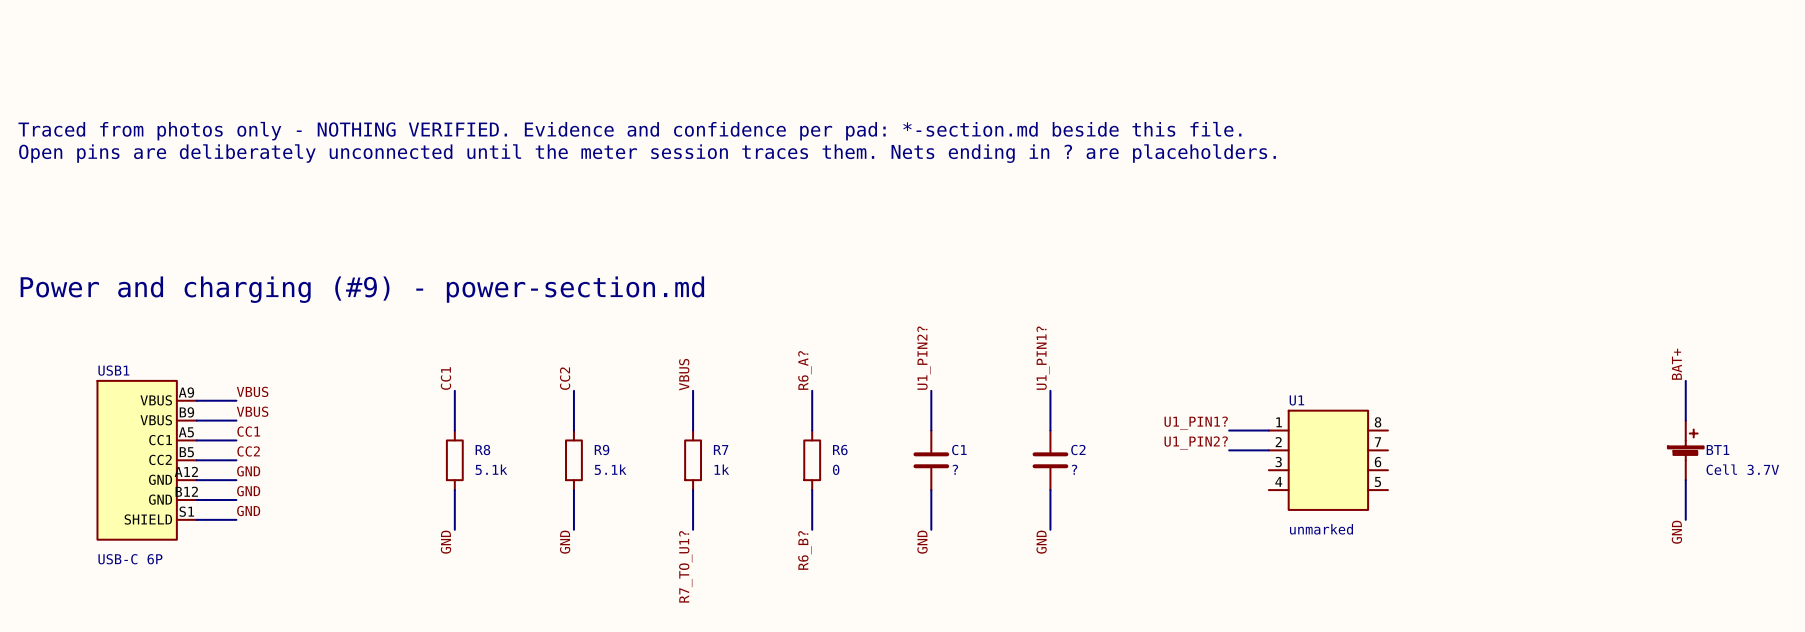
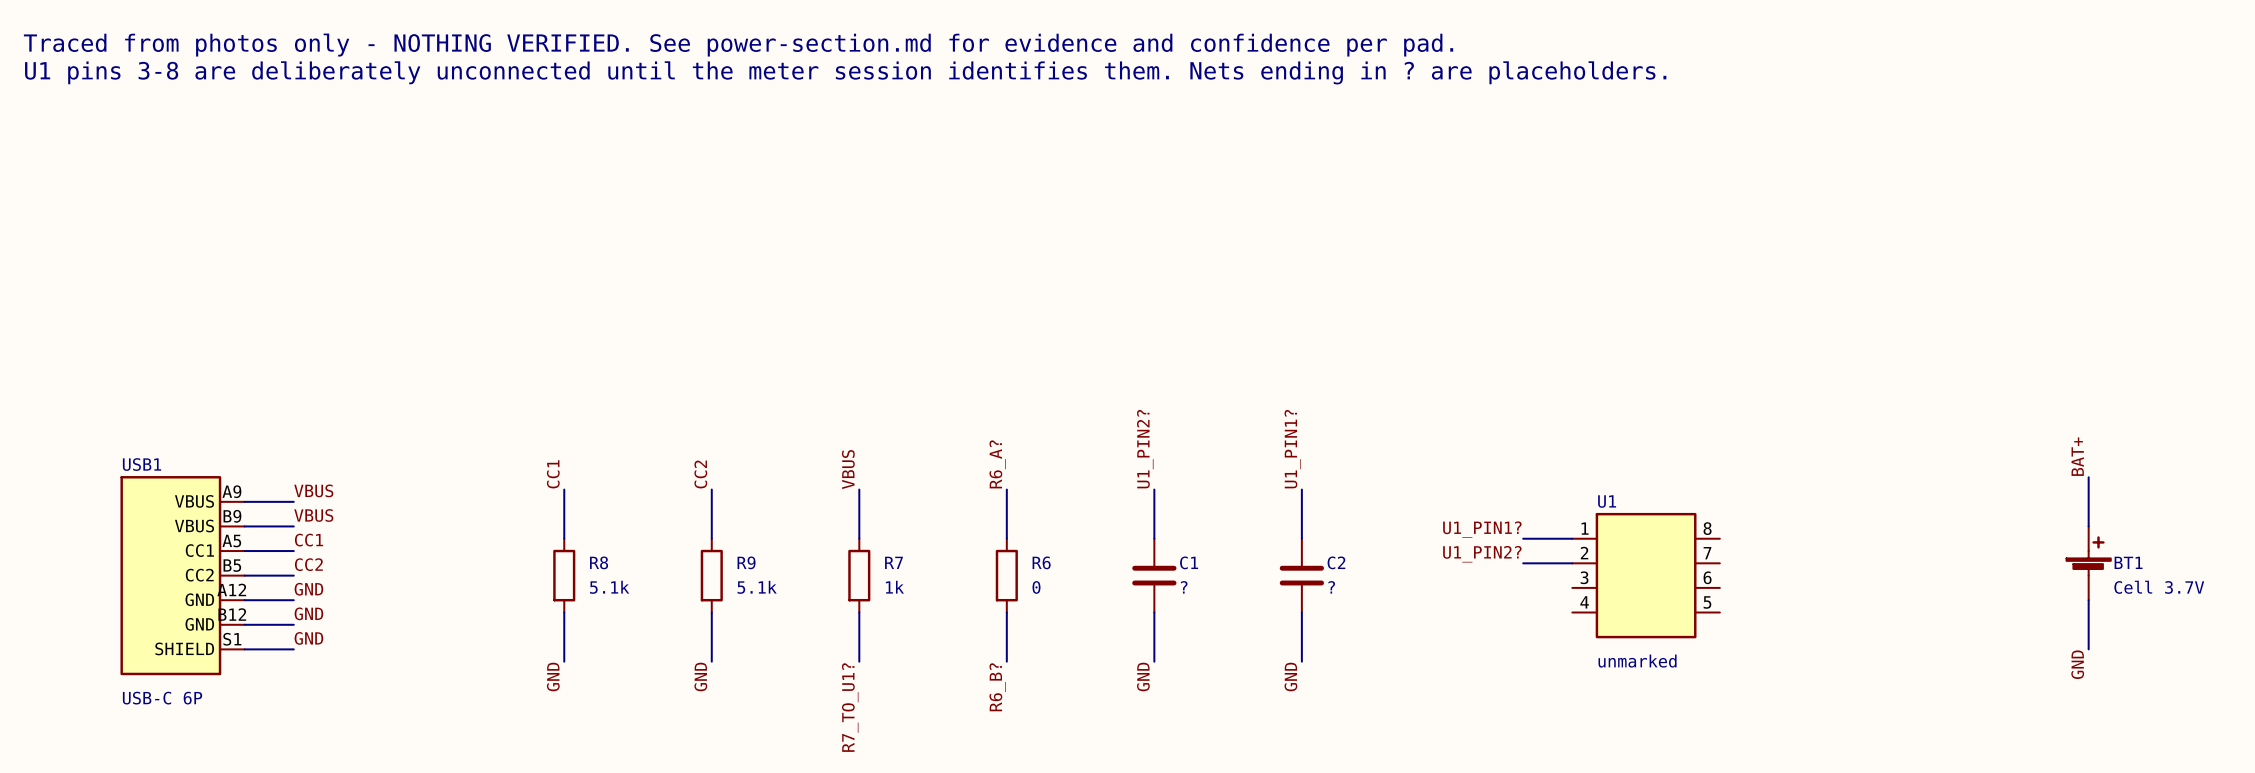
text: none -> Traced from photos only - NOTHING VERIFIED. See power-section.md for evidence and confidence per pad. (738, 45)
text: none -> U1 pins 3-8 are deliberately unconnected until the meter session identifies them. Nets ending in ? are placeholders. (845, 72)
text: Traced from photos only - NOTHING VERIFIED. Evidence and confidence per pad: *-section.md beside this file. (629, 131) -> none
text: Open pins are deliberately unconnected until the meter session traces them. Nets ending in ? are placeholders. (647, 153) -> none
text: Power and charging (#9) - power-section.md (362, 289) -> none

